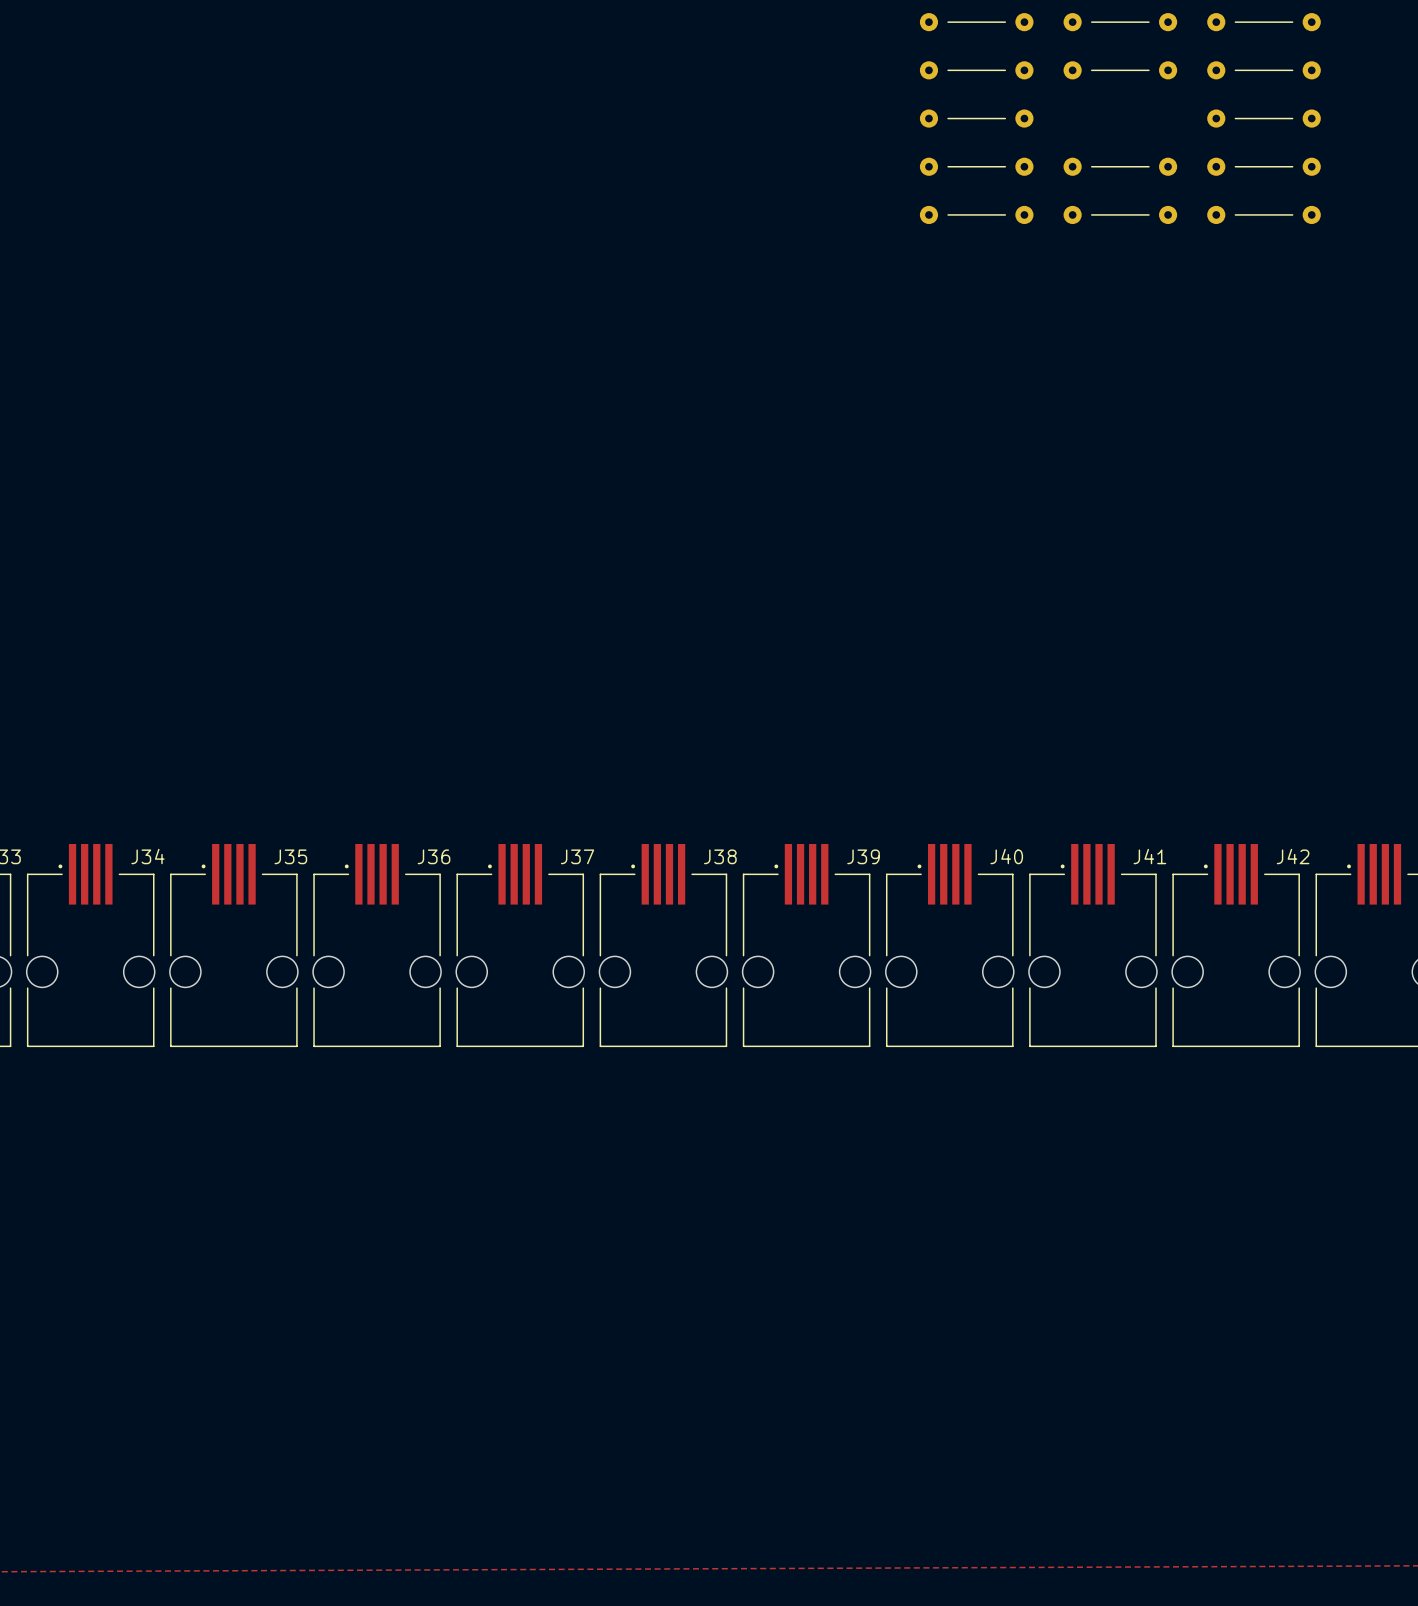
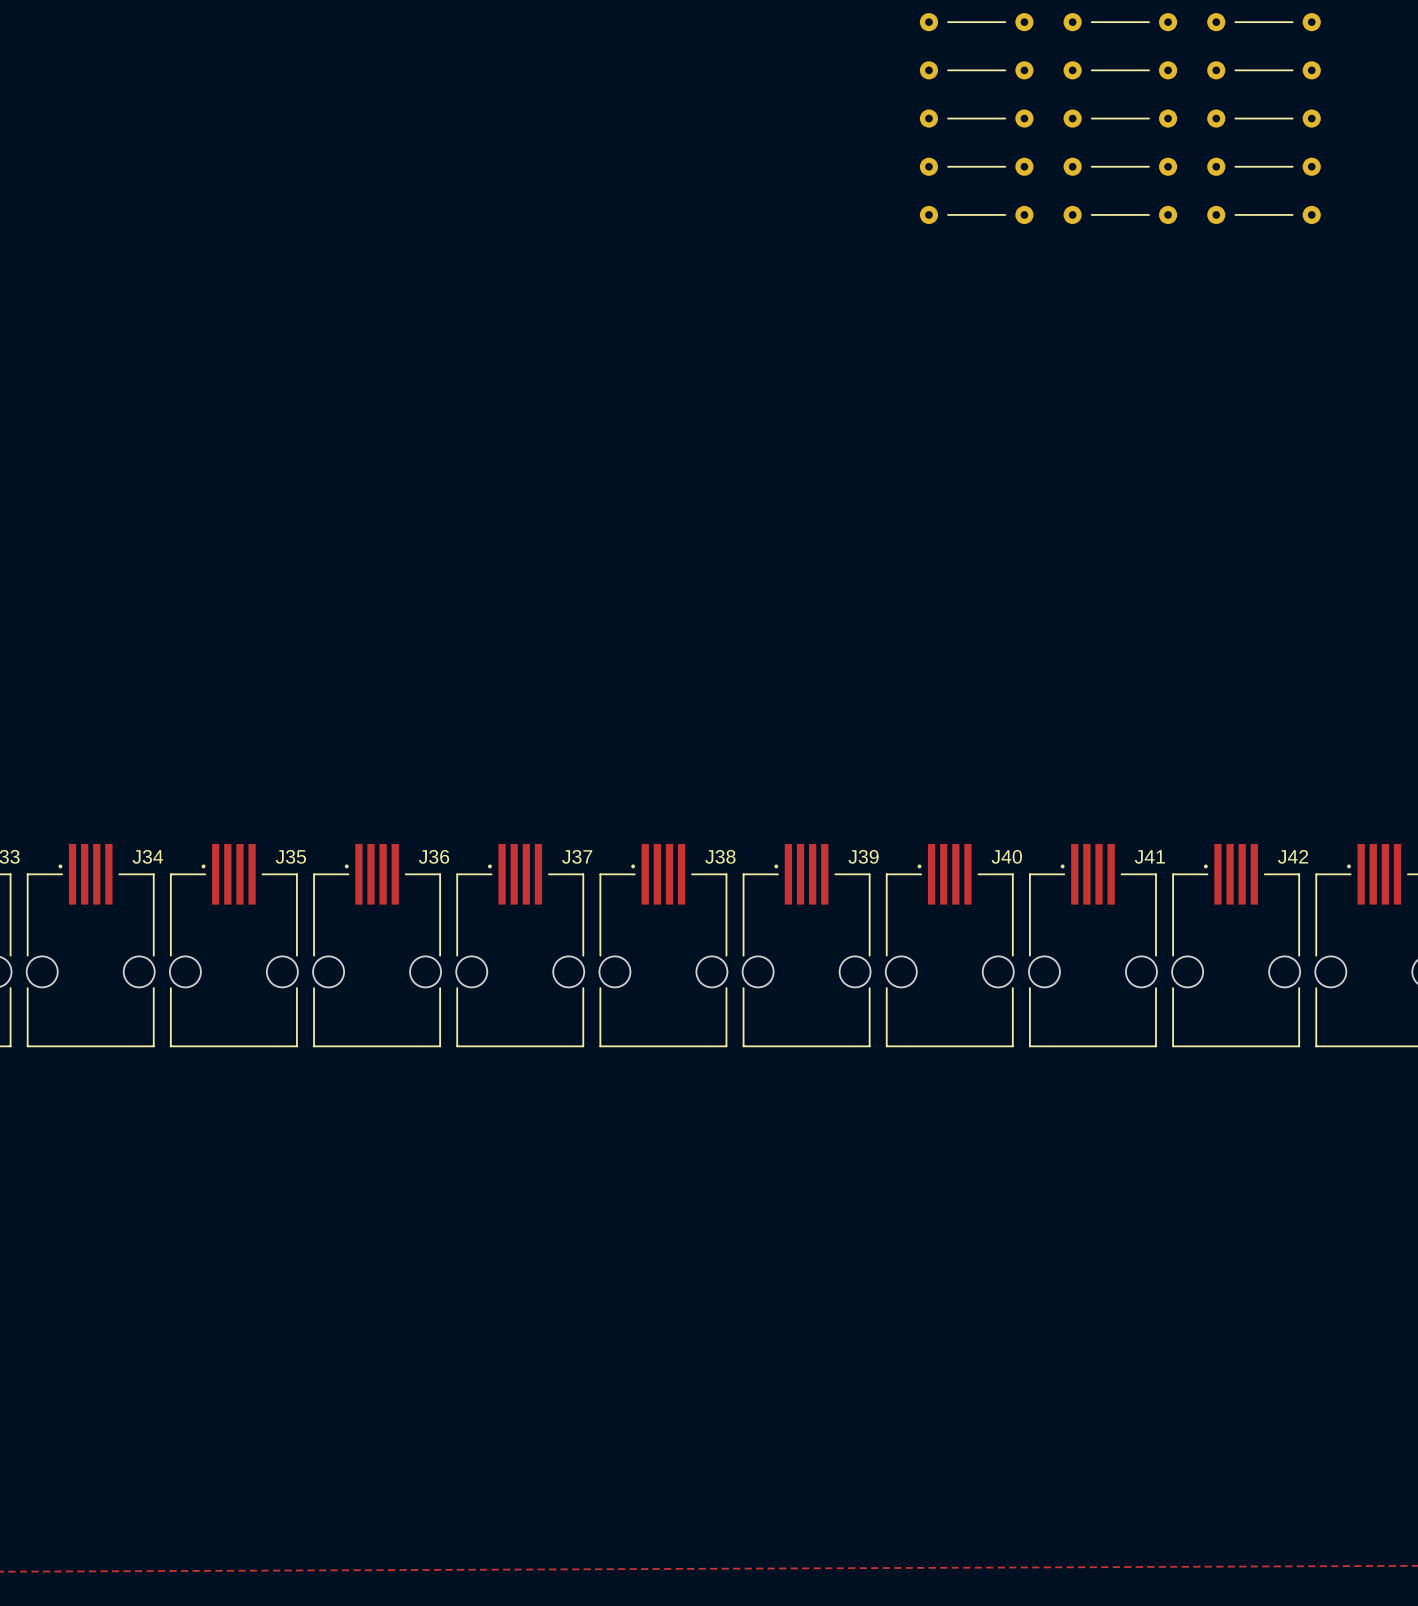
part: none -> (1120, 118)

